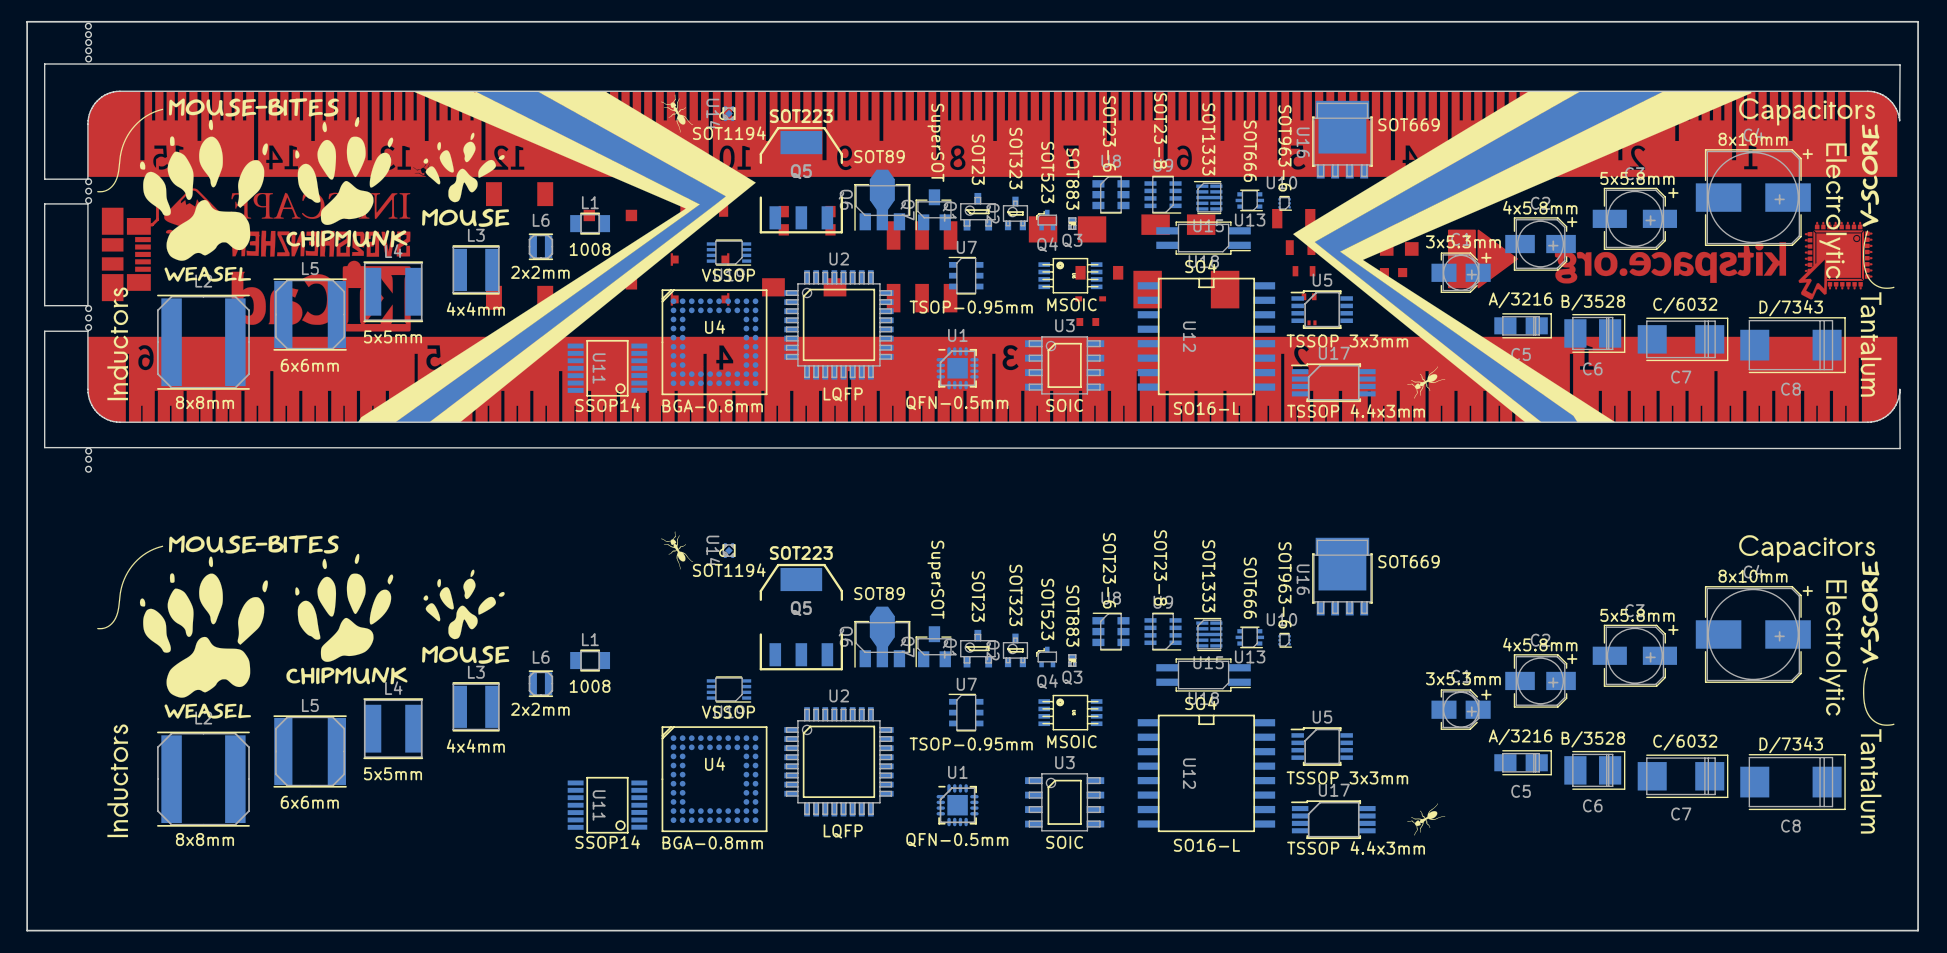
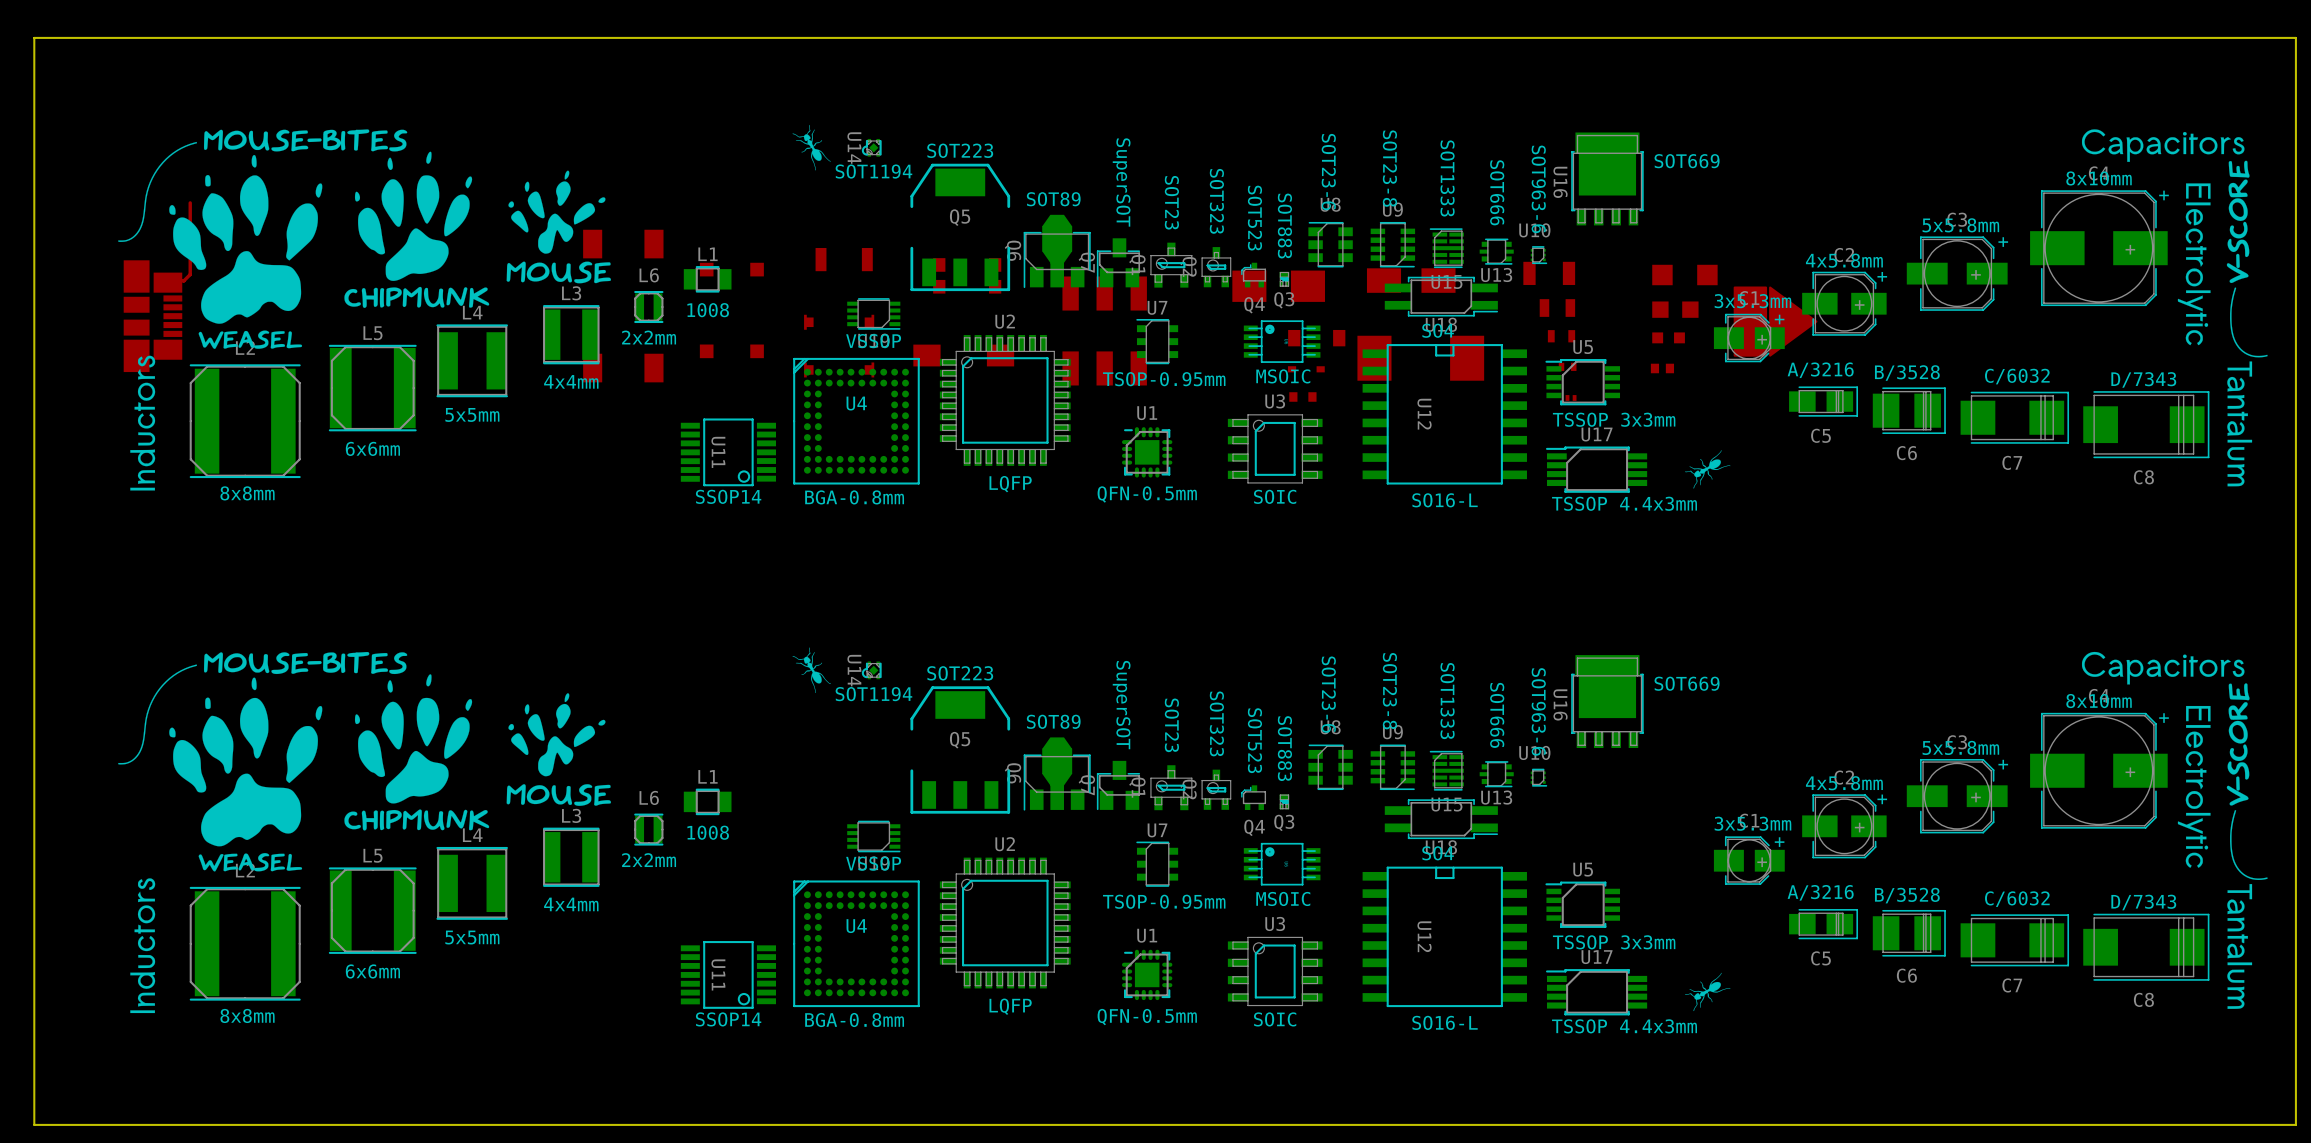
part: (972, 247) -> none

